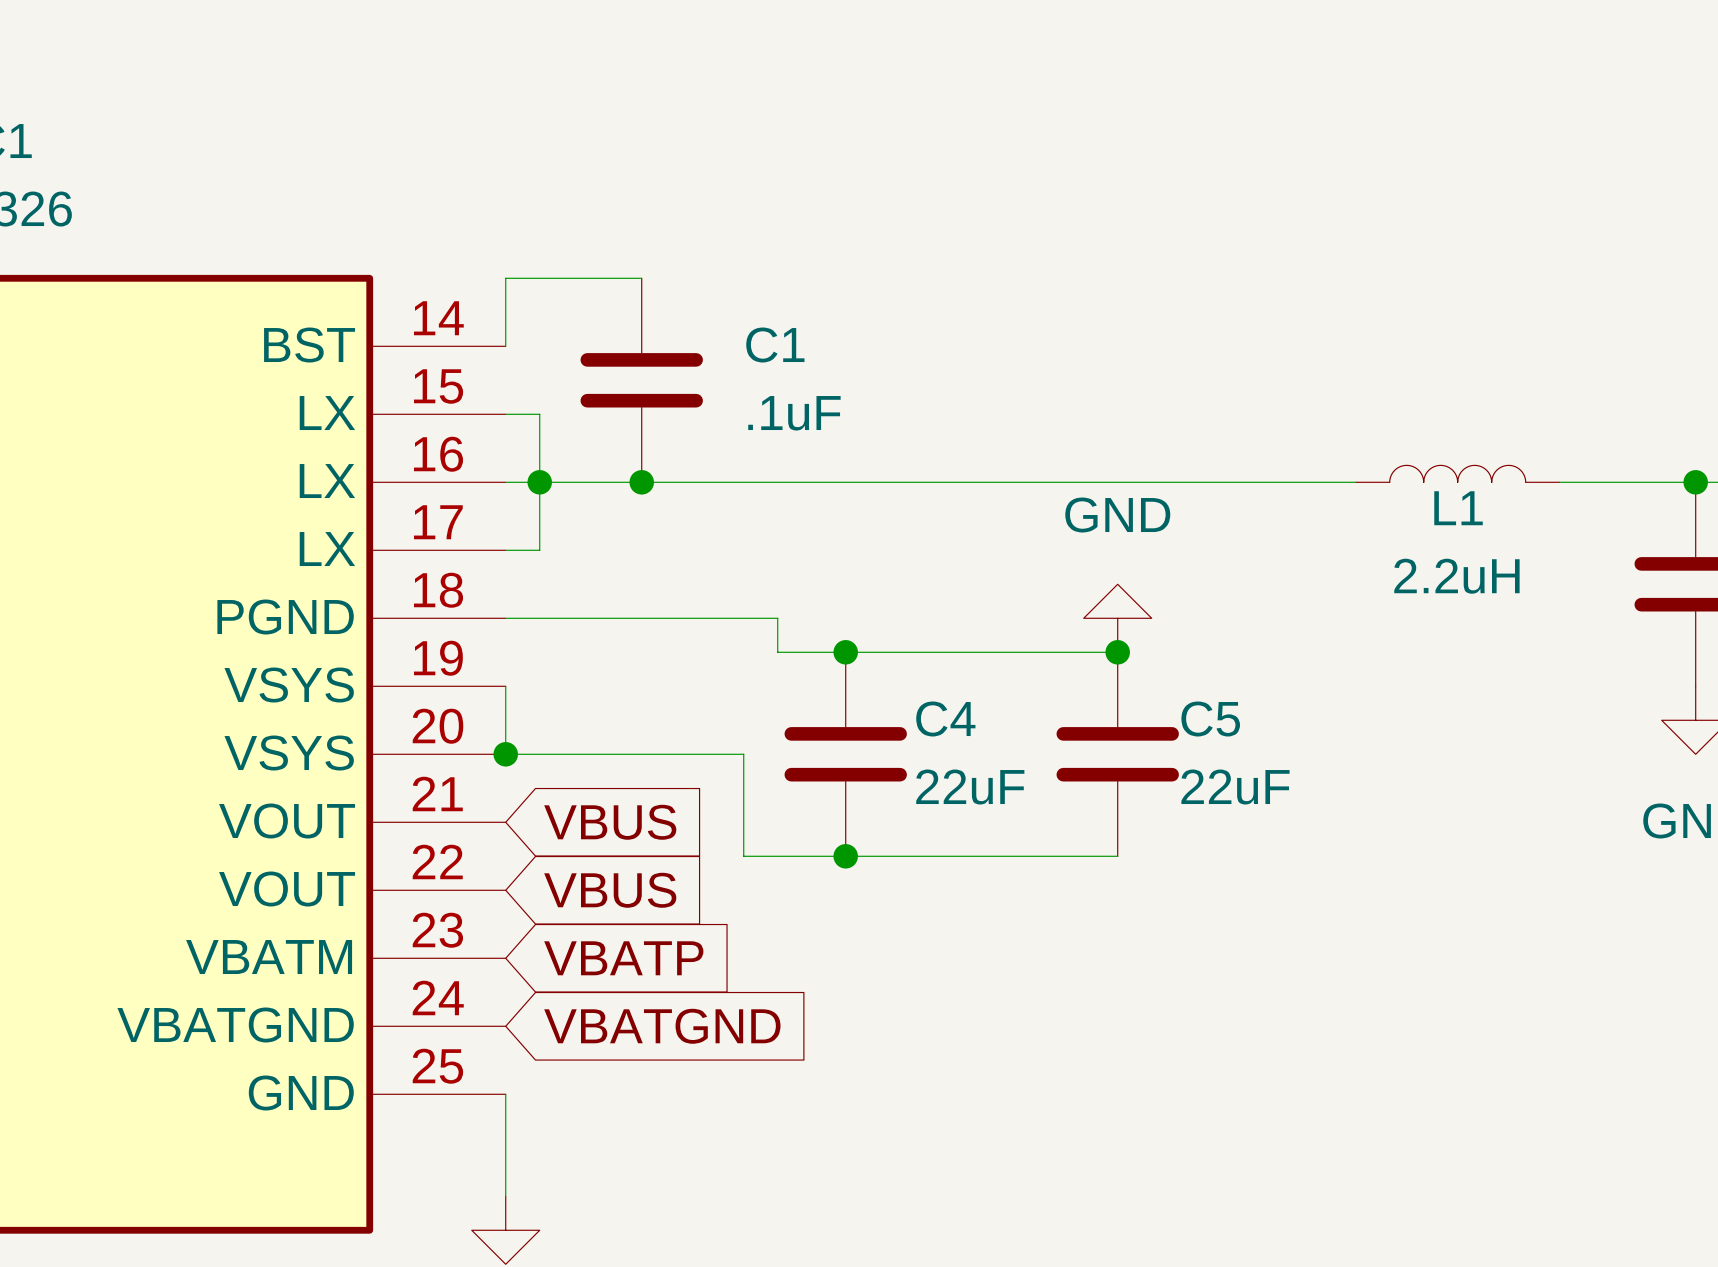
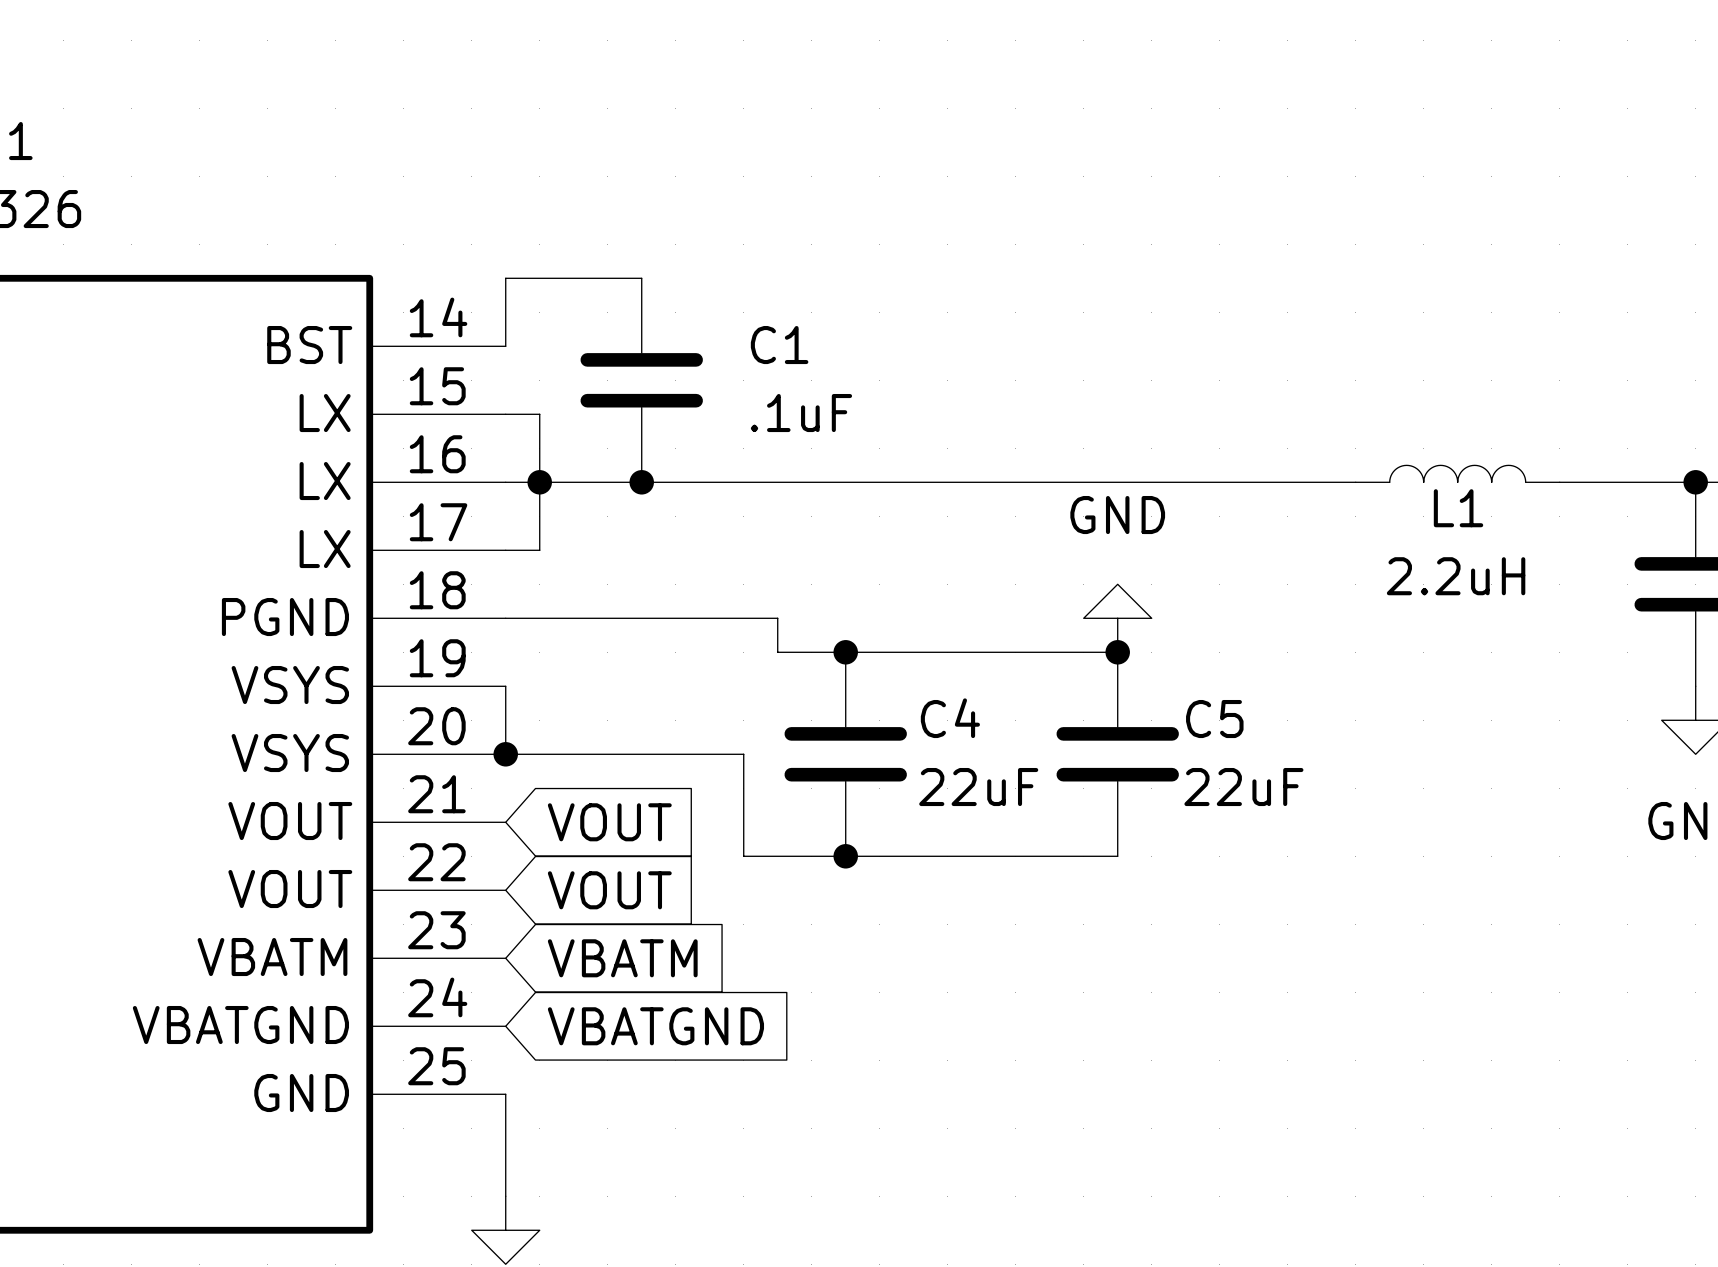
global label: VBUS (610, 822) -> VOUT (609, 822)
global label: VBUS (610, 890) -> VOUT (609, 890)
global label: VBATP (623, 958) -> VBATM (622, 958)

